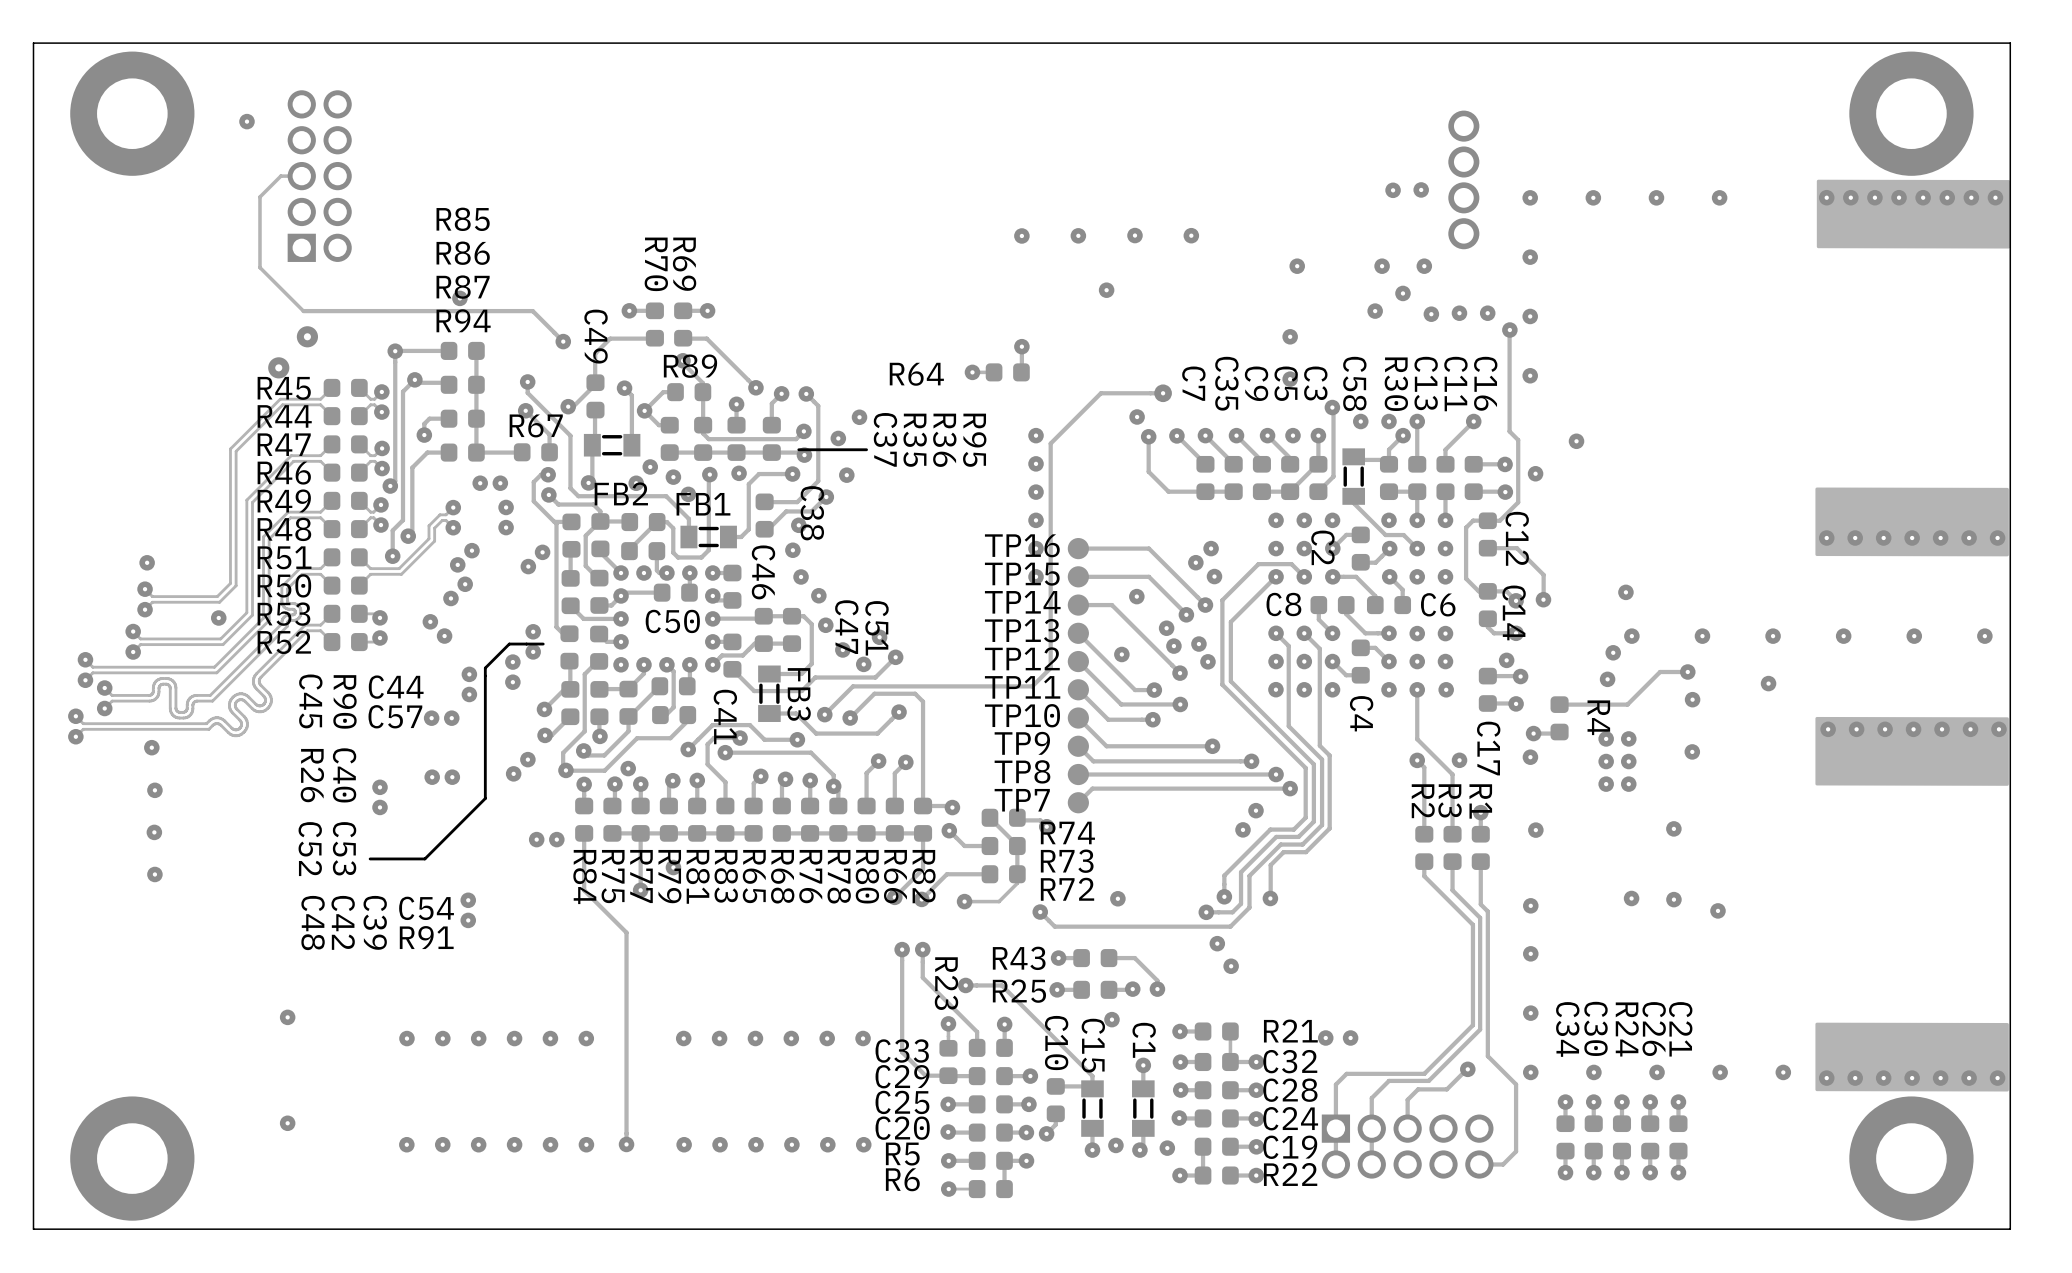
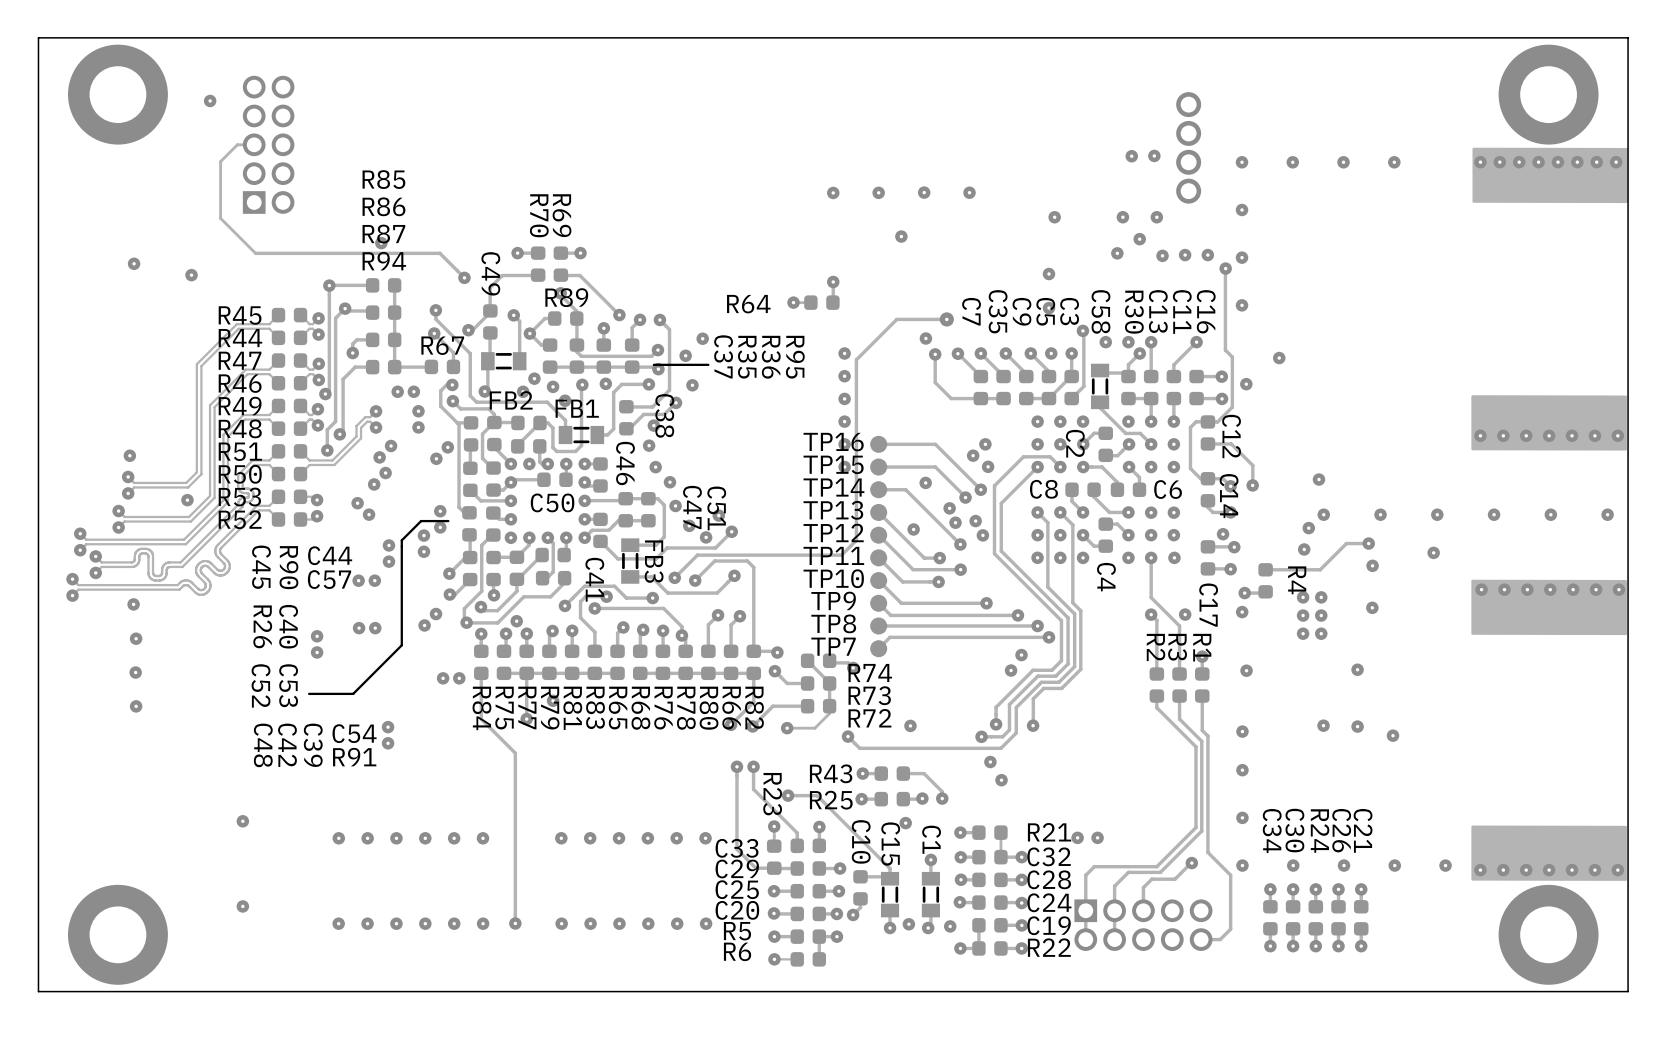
via: none -> (134, 263)
via: (307, 336) -> none
via: none -> (191, 275)
via: (278, 367) -> none

